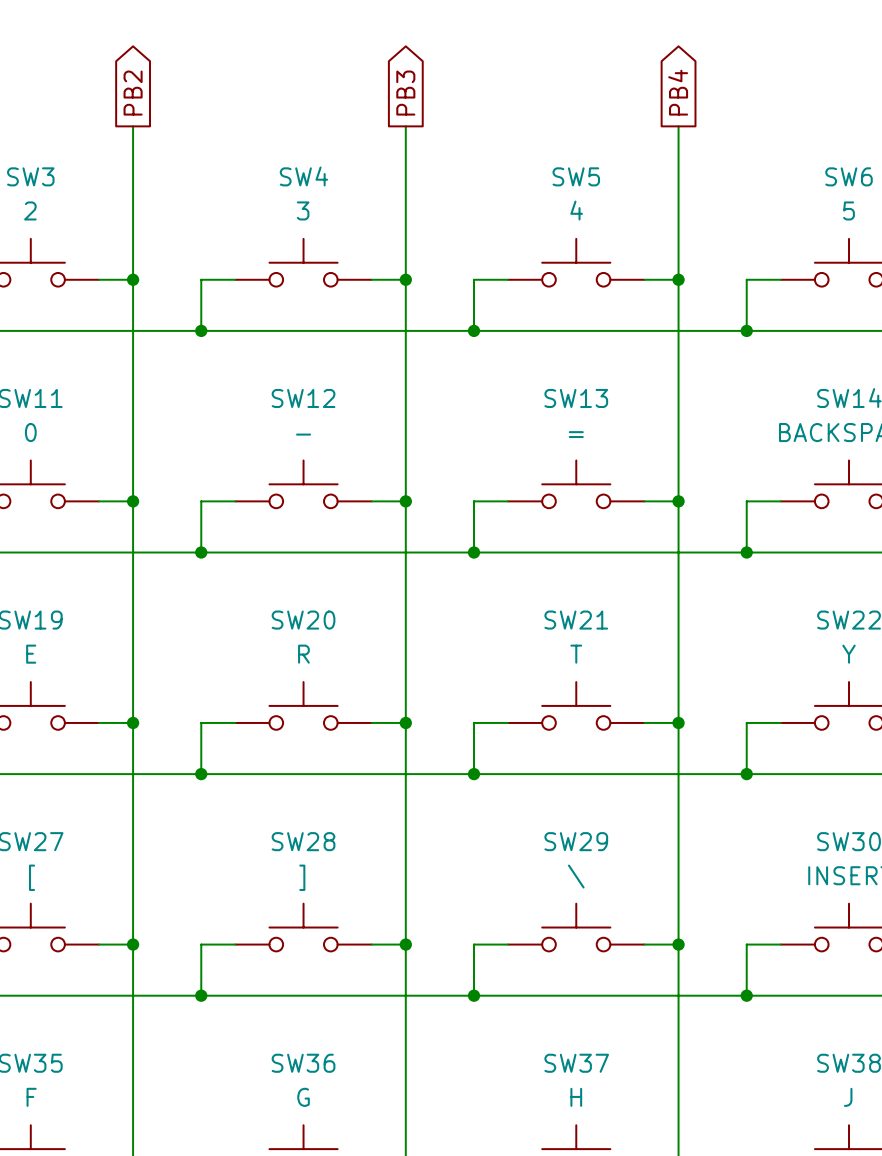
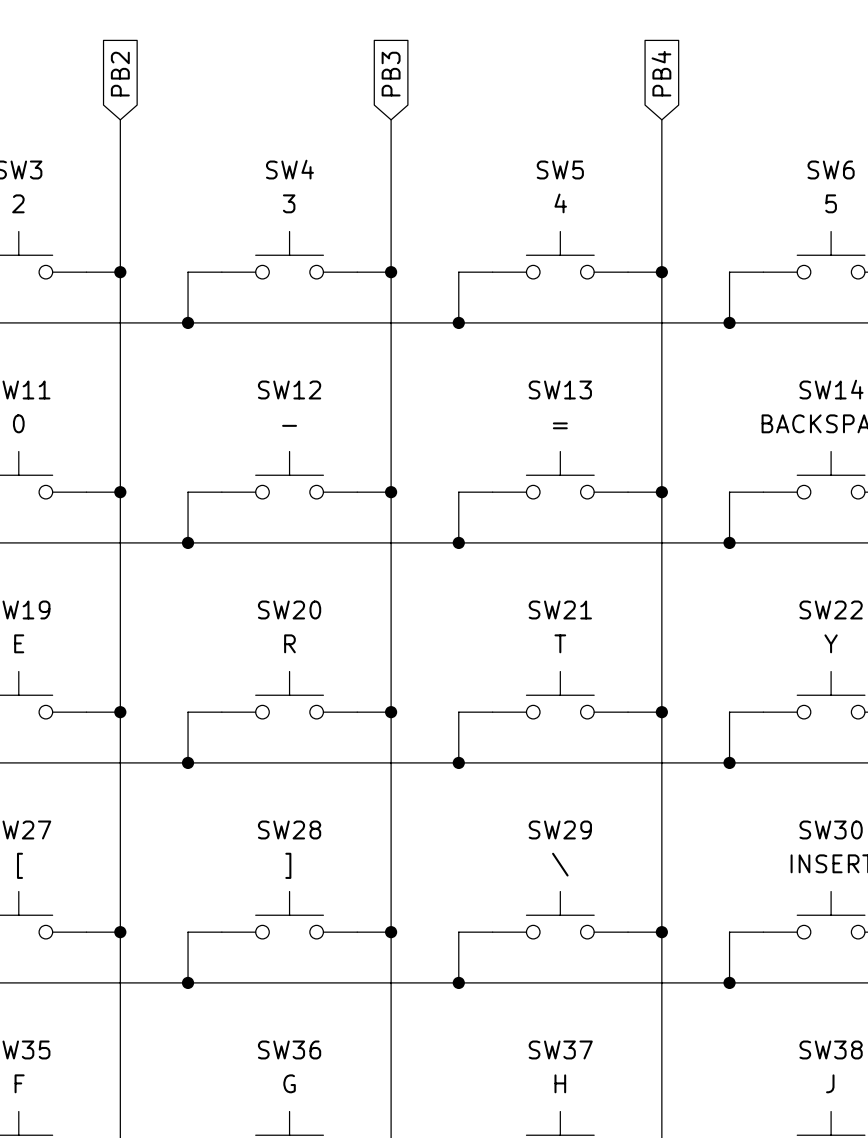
global label shape: output (678, 92) -> input (661, 73)
global label shape: output (133, 93) -> input (120, 74)
global label shape: output (405, 93) -> input (391, 74)

